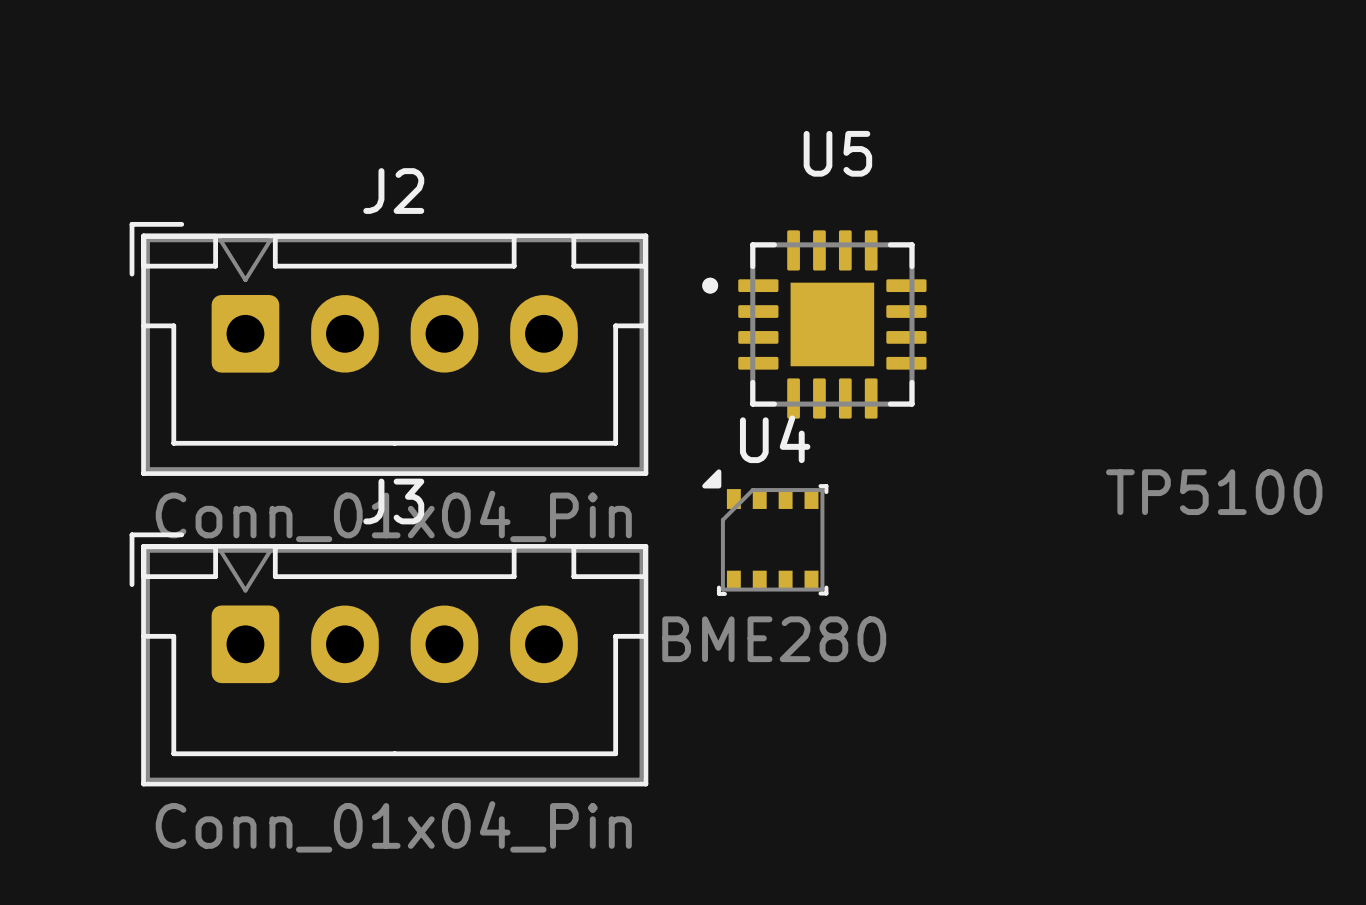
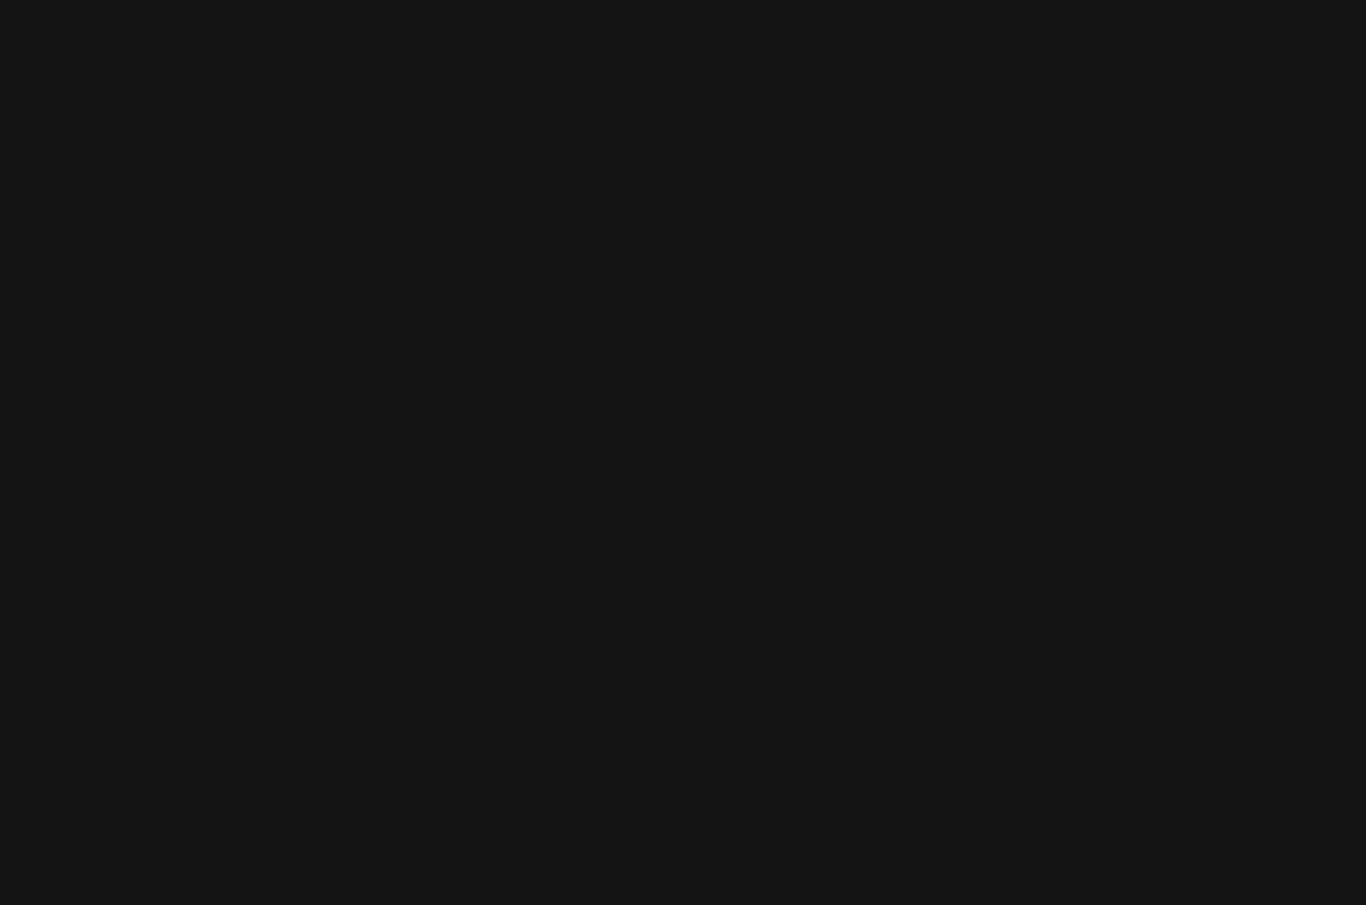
U5: TP5100 (814, 324) -> none
J2: Conn_01x04_Pin (388, 348) -> none
U4: BME280 (765, 532) -> none
J3: Conn_01x04_Pin (388, 659) -> none

